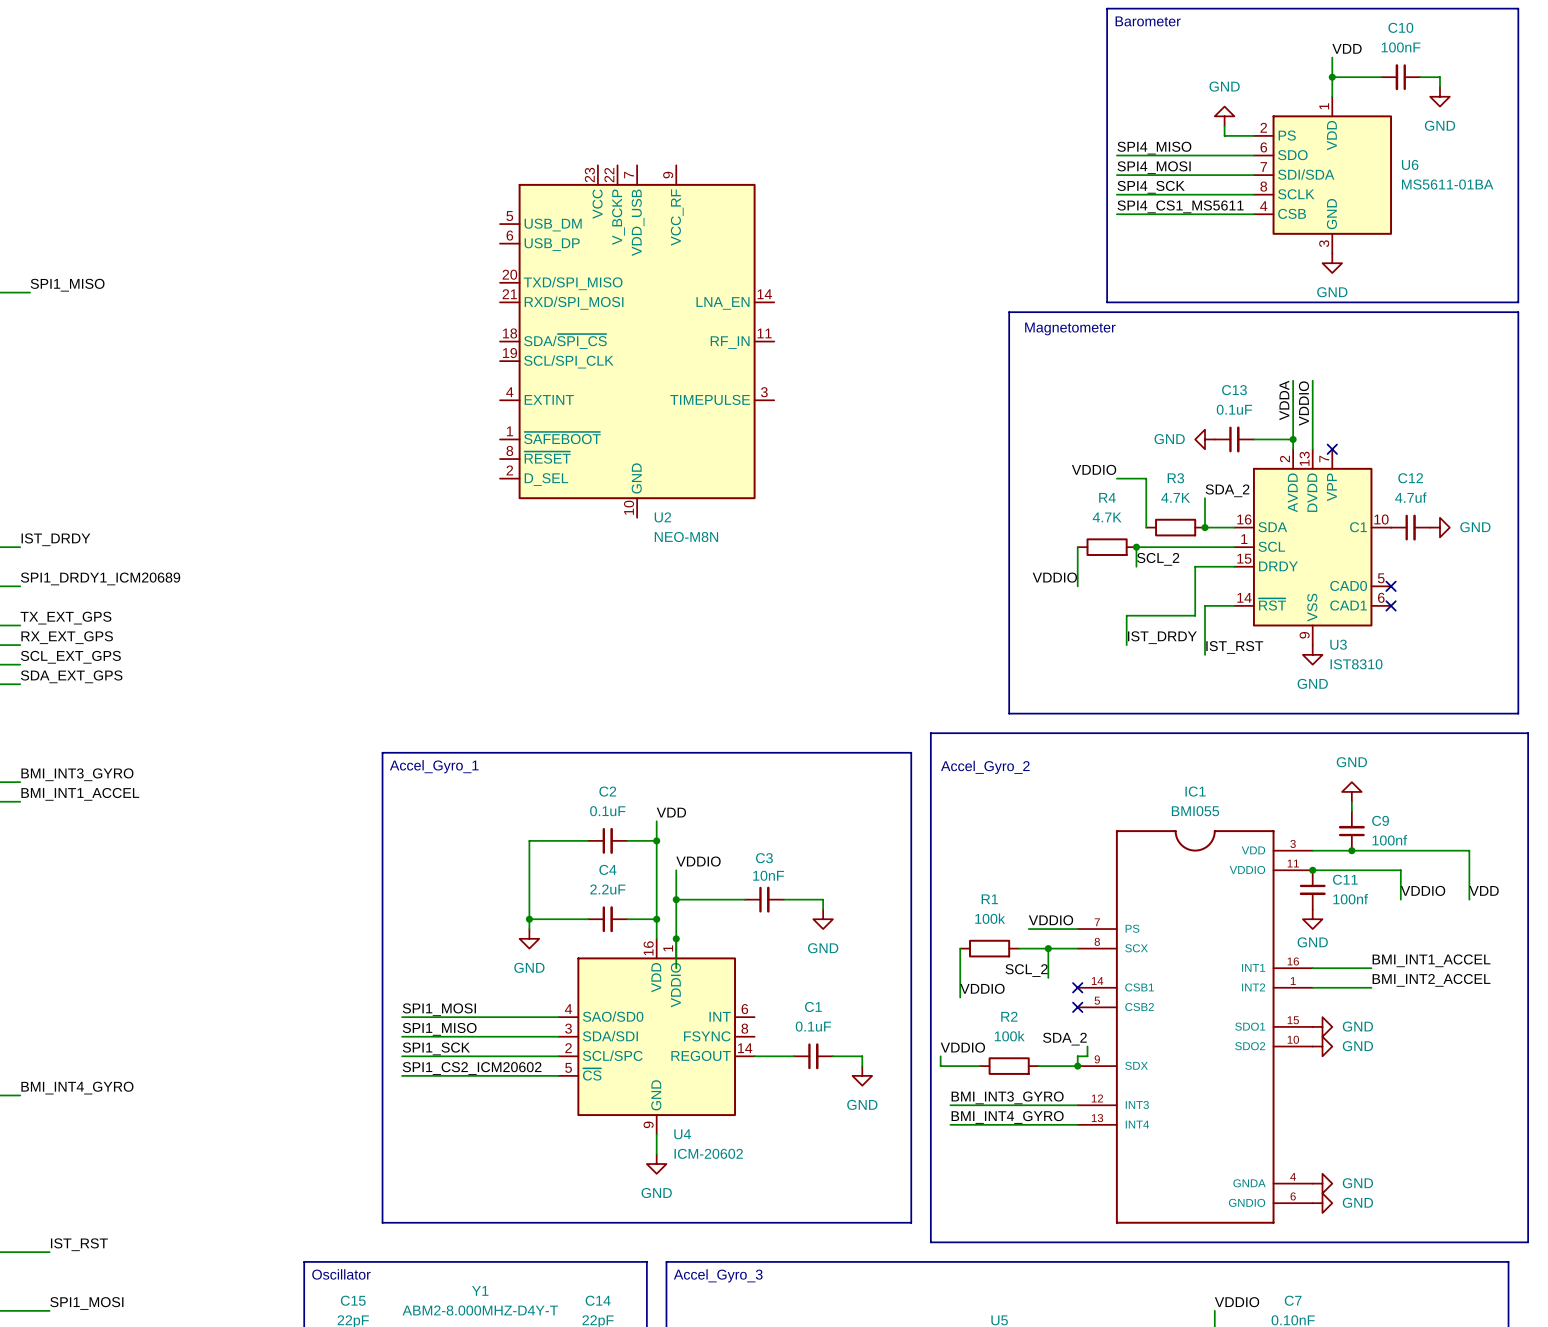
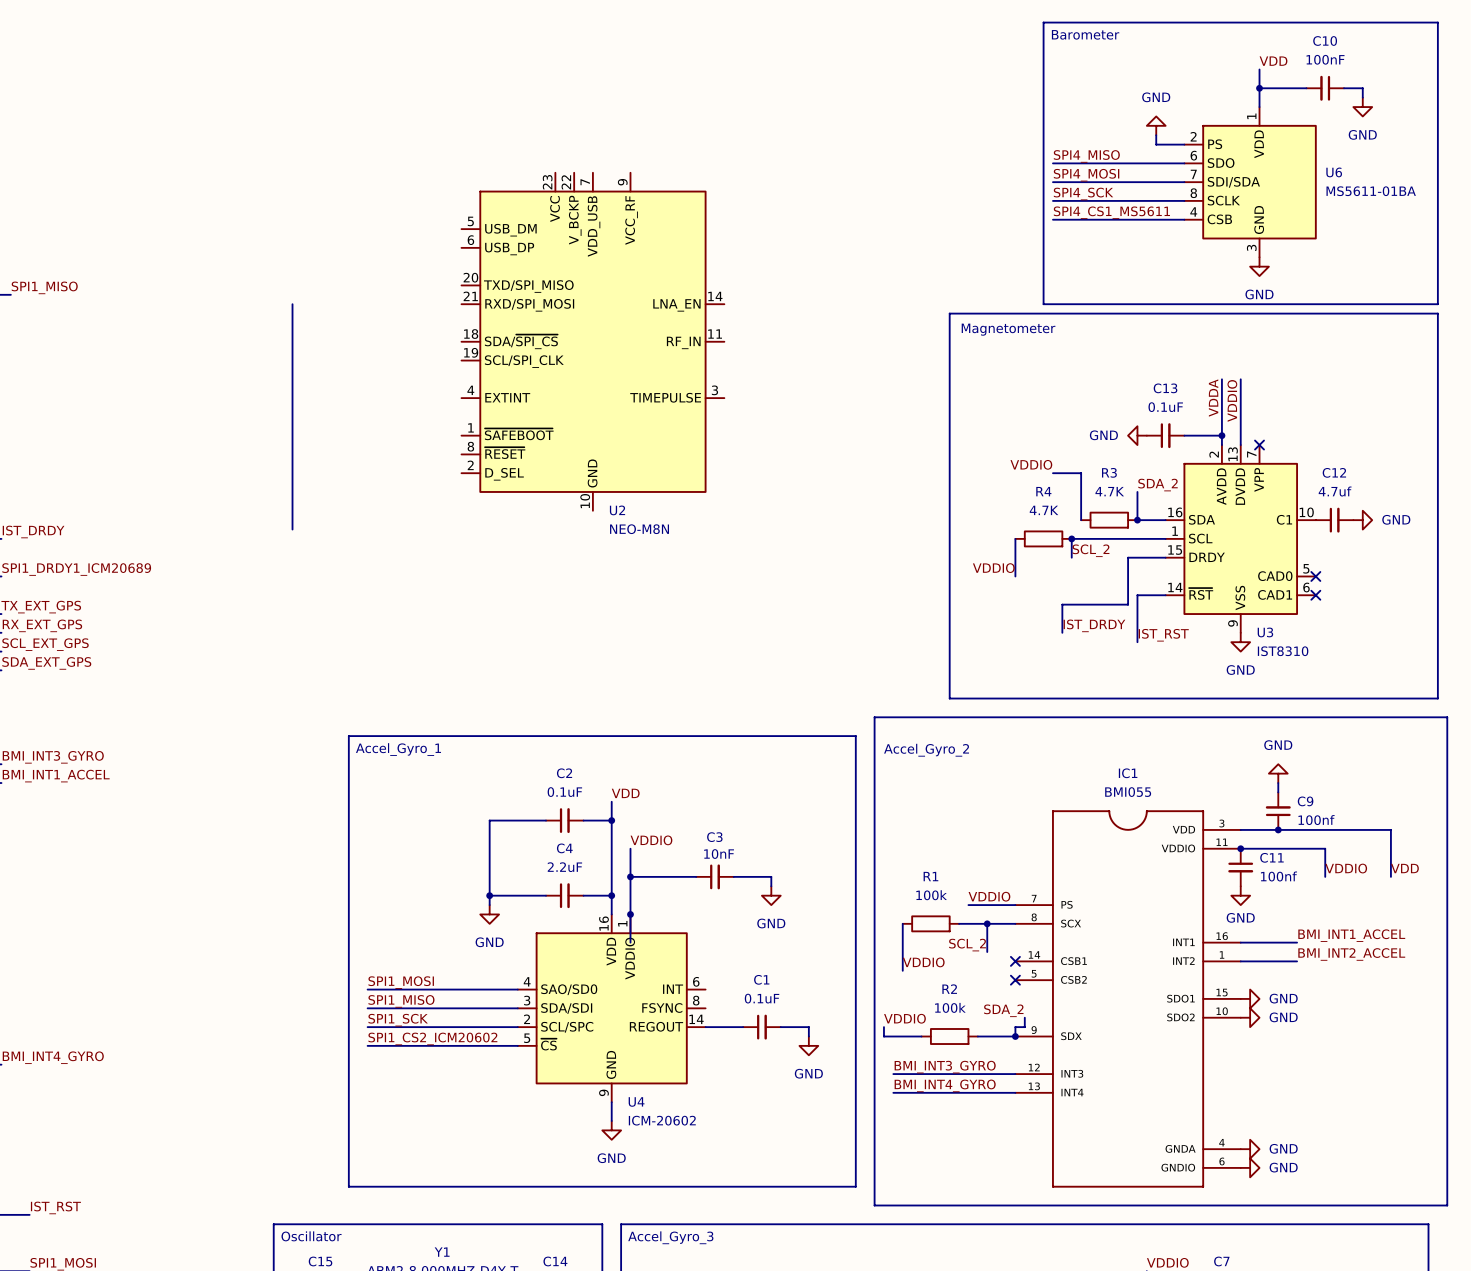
wire: none -> (292, 304) (292, 529)

